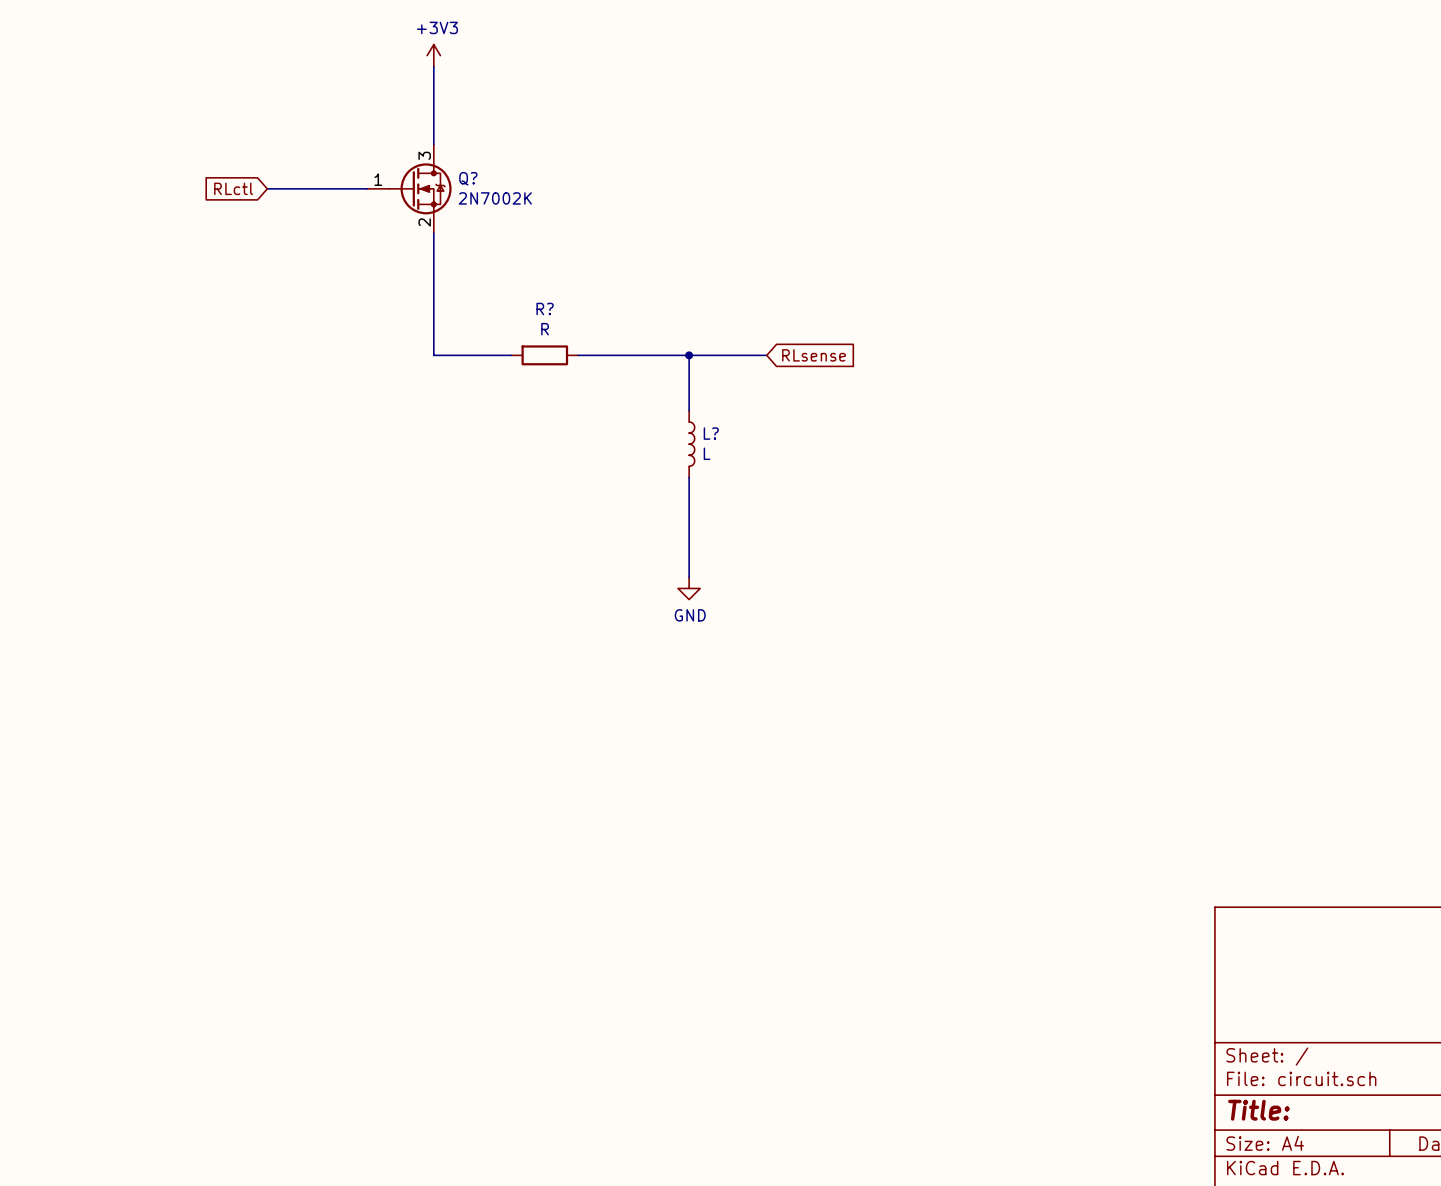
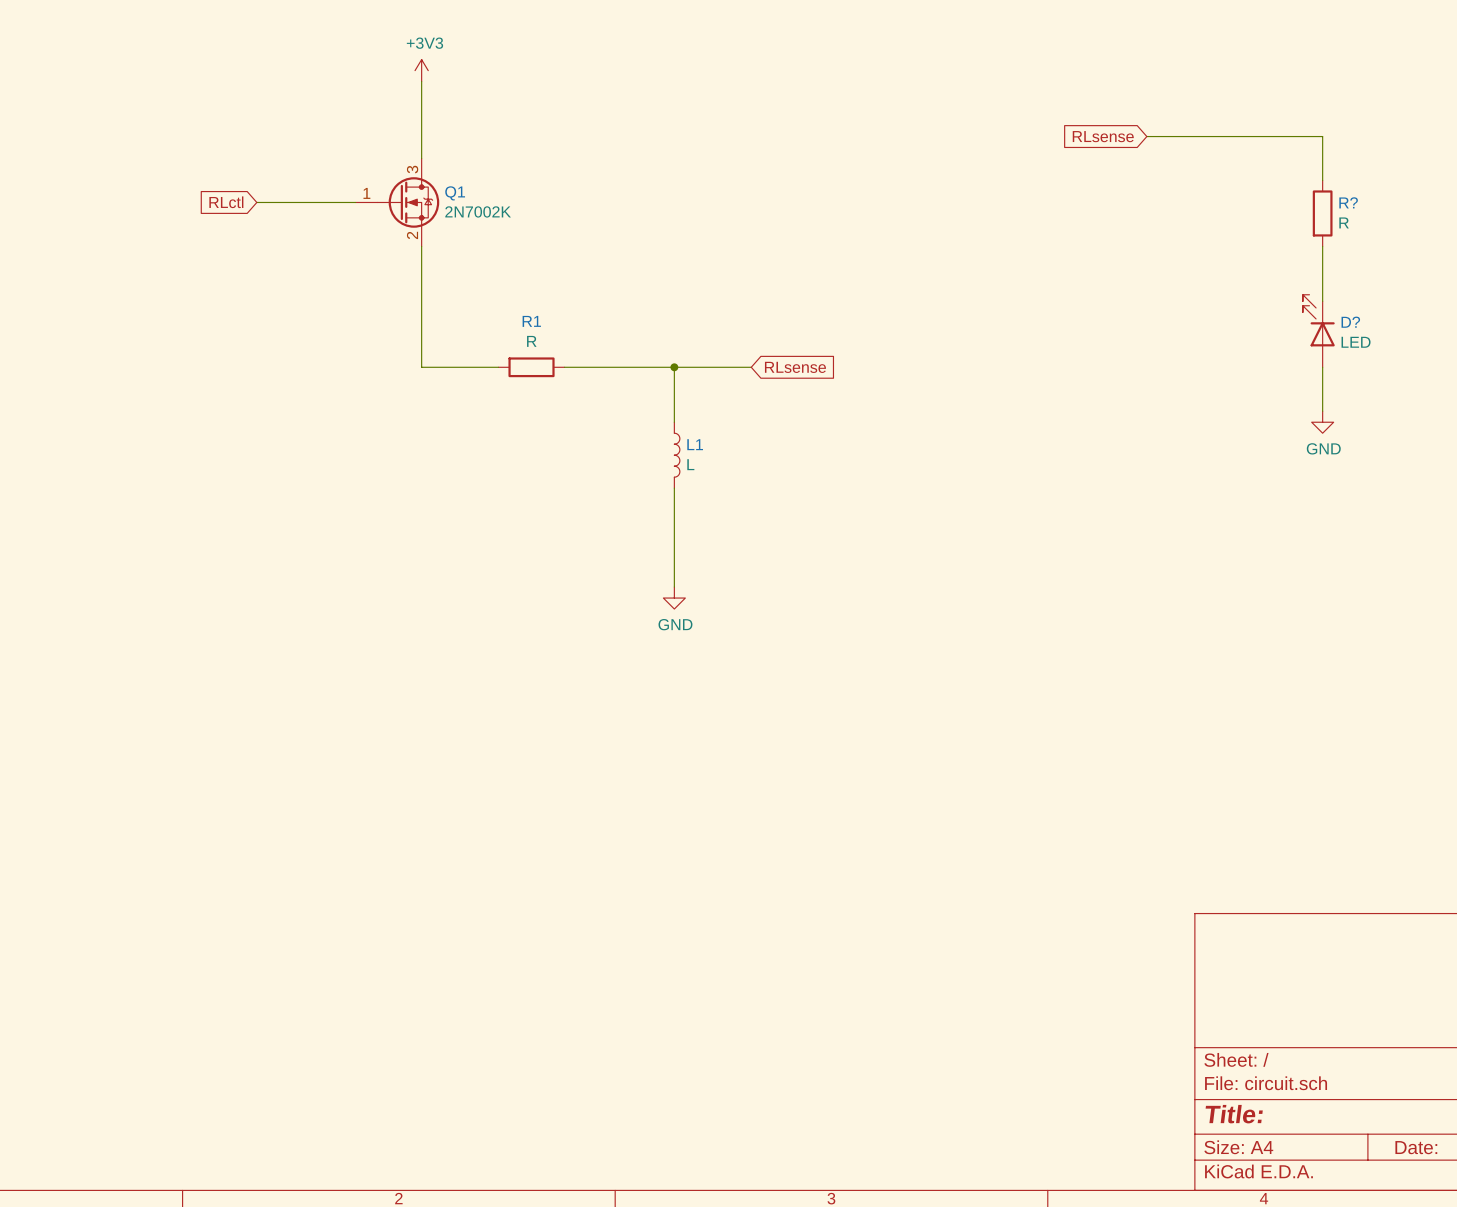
global label: none -> RLsense (1103, 136)
wire: none -> (1146, 136) (1322, 136) (1322, 180)
Q? name: Q? (468, 178) -> Q1 (455, 193)
R?: none -> R (1322, 213)
wire: none -> (1322, 246) (1322, 301)
R? name: R? (545, 308) -> R1 (531, 321)
D?: none -> LED (1318, 331)
wire: none -> (1322, 367) (1322, 411)
power symbol: none -> GND (1322, 422)
L? name: L? (711, 433) -> L1 (695, 444)

